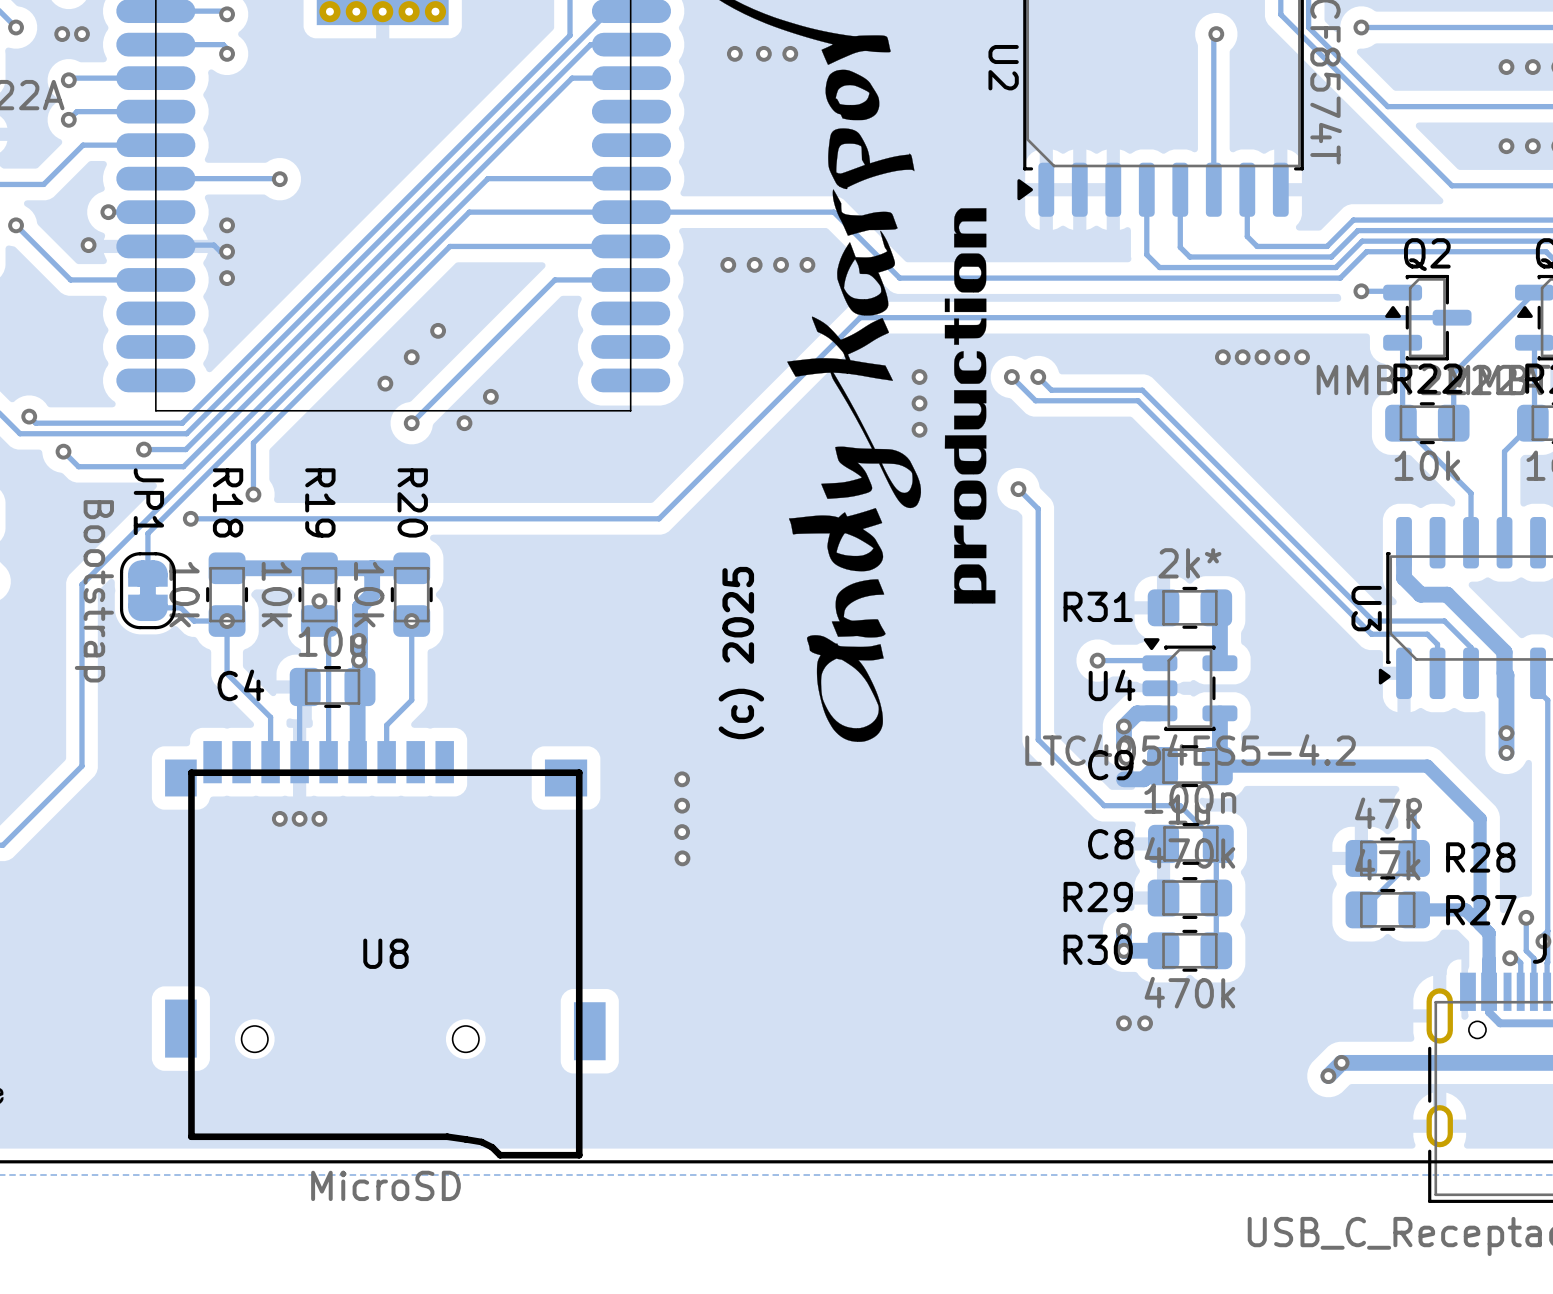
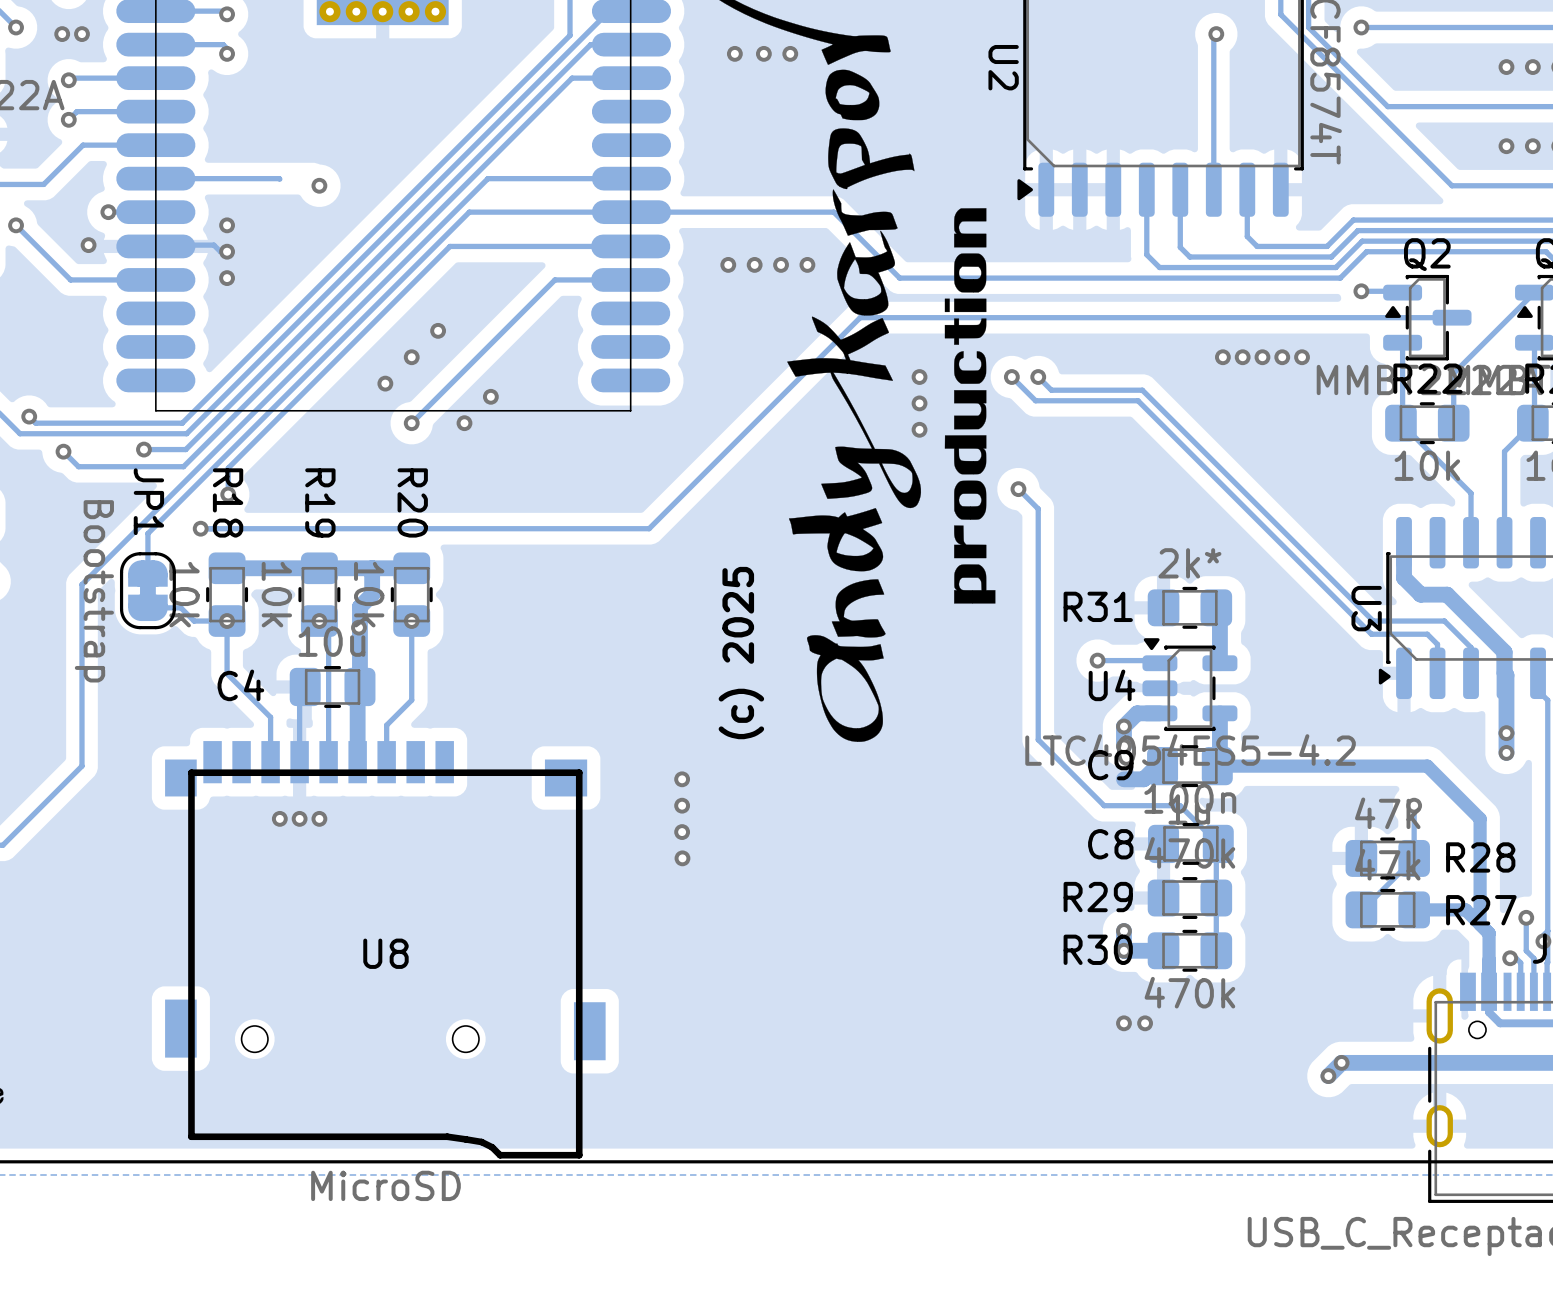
via position: (279, 179) -> (319, 185)
track: (253, 442) (253, 494) -> (253, 442) (228, 468) (228, 494)
via: none -> (228, 494)
via: (253, 494) -> none
via position: (190, 518) -> (200, 528)
track: (659, 518) (190, 518) -> (659, 518) (649, 528) (200, 528)
via position: (319, 601) -> (319, 621)
via position: (358, 640) -> (358, 627)
via: (358, 660) -> none

